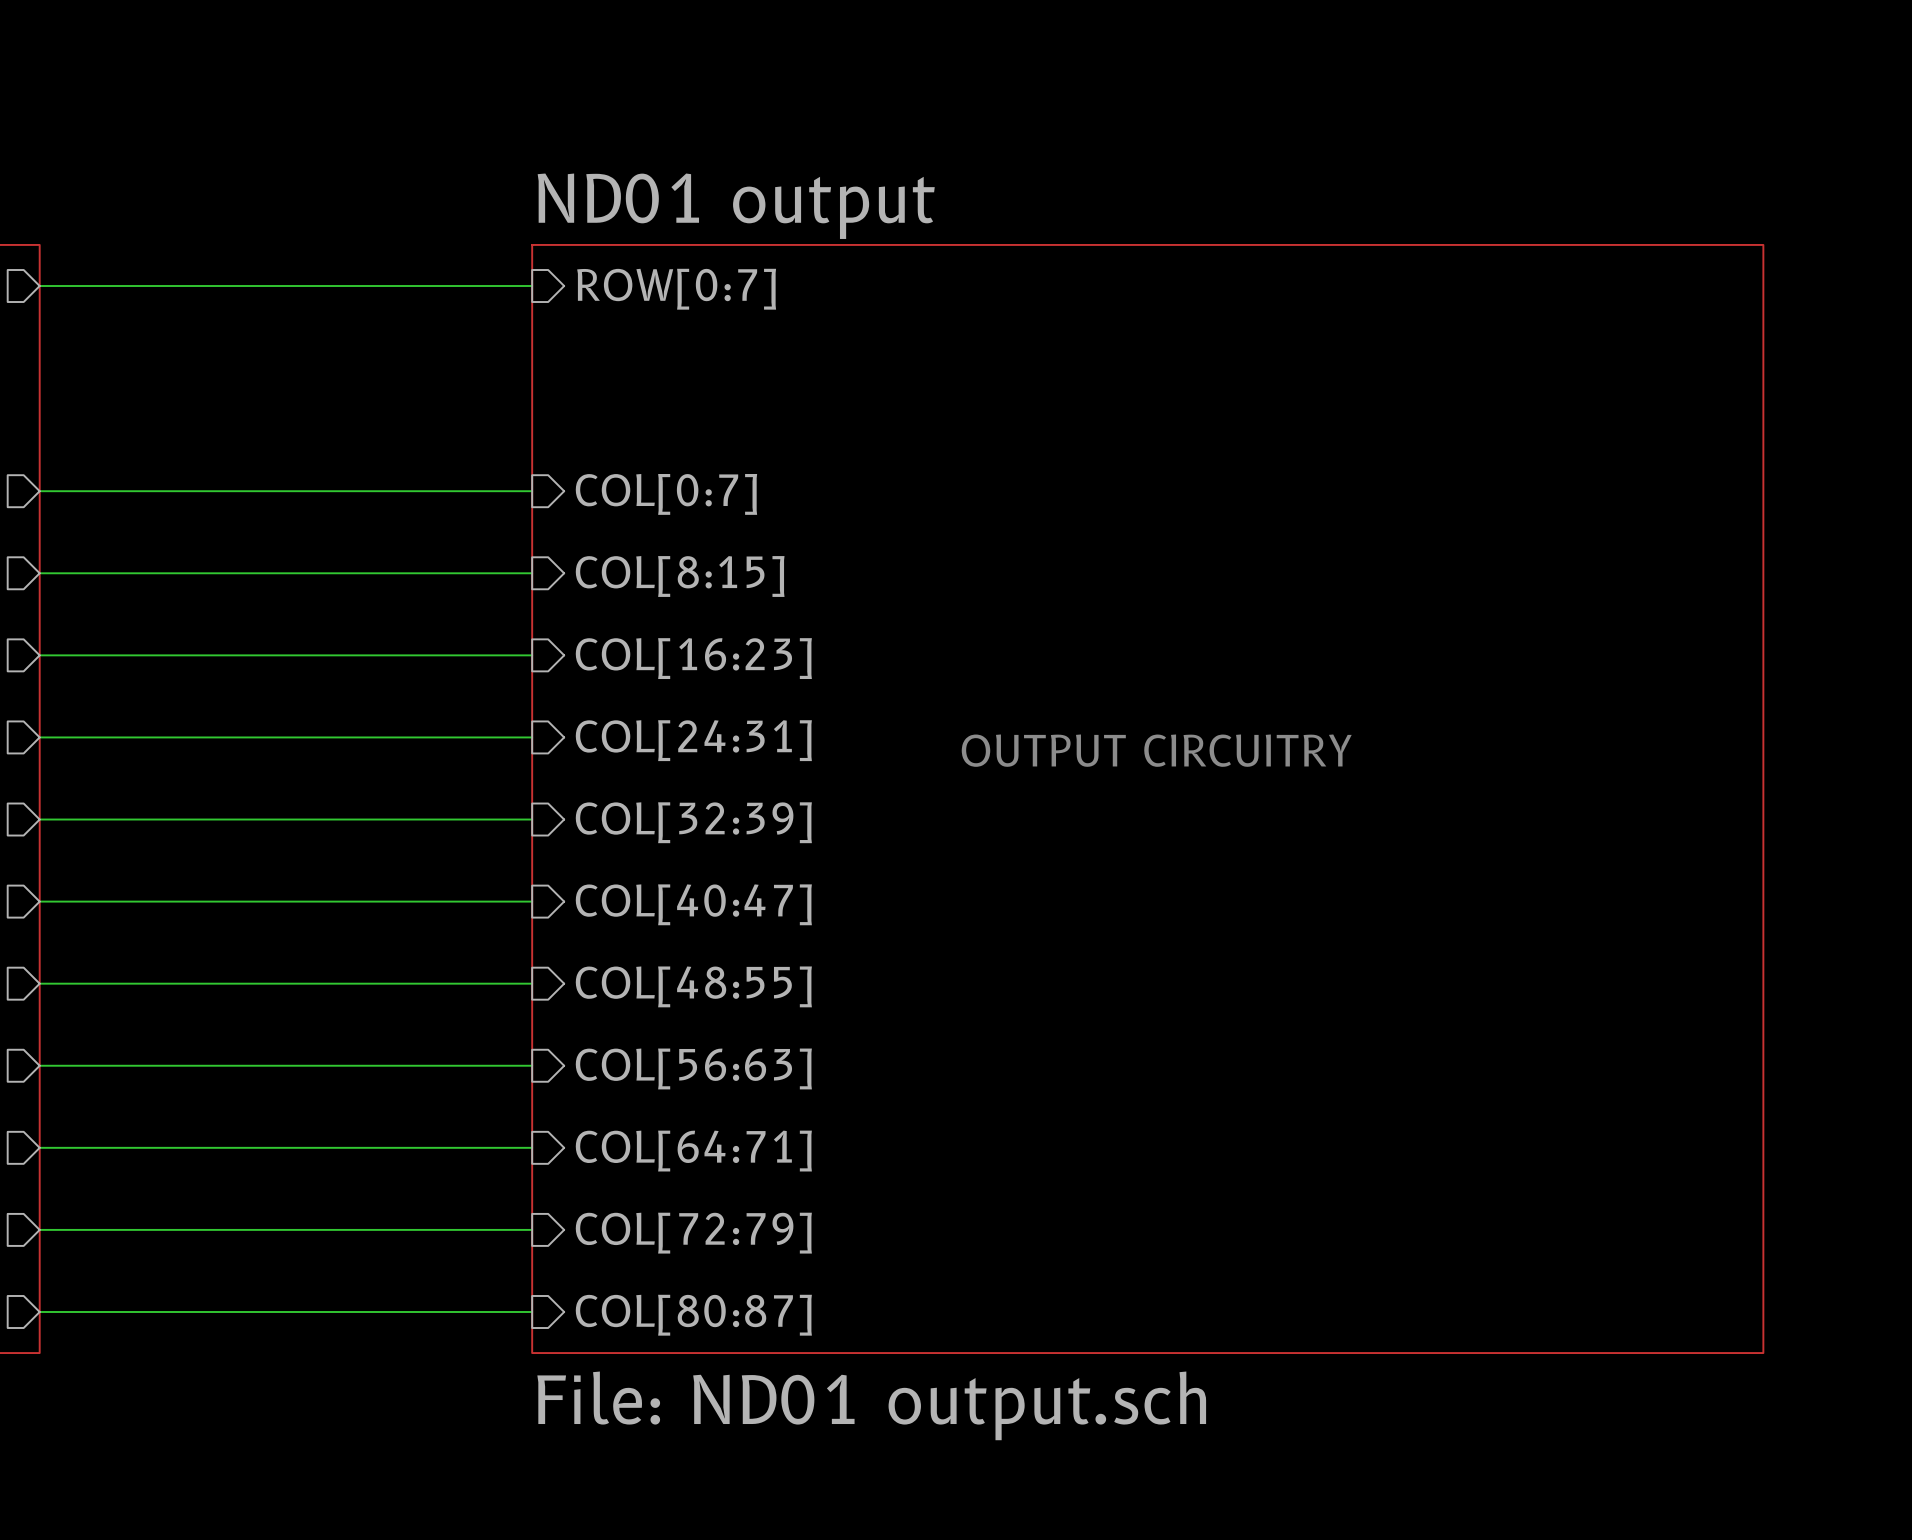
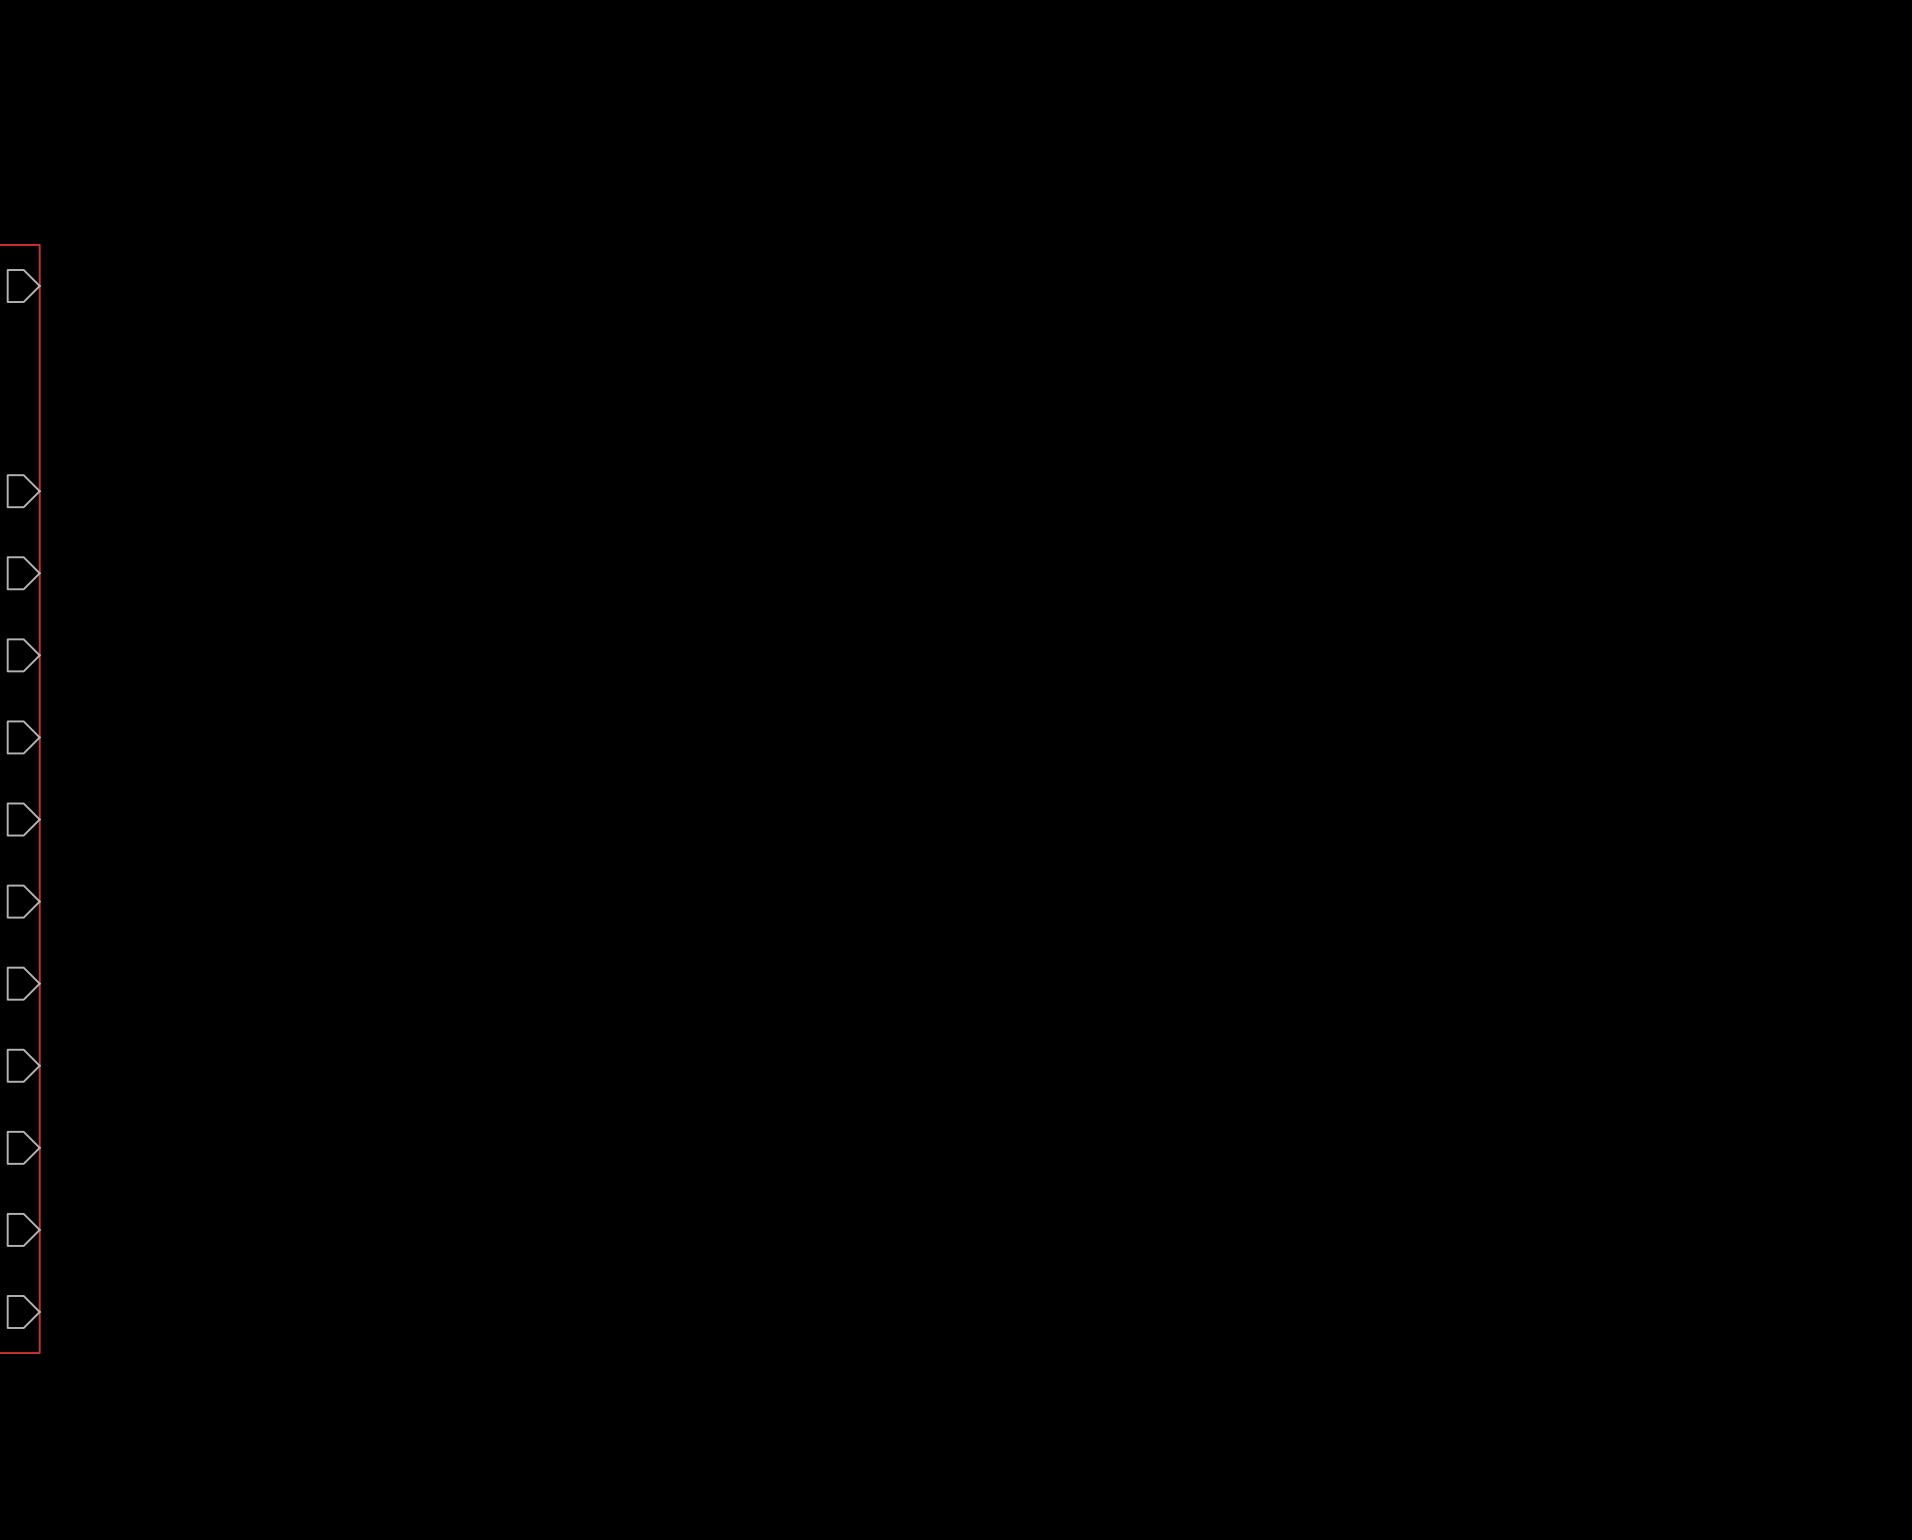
wire: (39, 286) (532, 286) -> none
sheet pin: ROW[0:7] (676, 289) -> none
wire: (39, 491) (532, 491) -> none
sheet pin: COL[0:7] (666, 494) -> none
wire: (39, 573) (532, 573) -> none
sheet pin: COL[8:15] (680, 576) -> none
wire: (39, 655) (532, 655) -> none
sheet pin: COL[16:23] (693, 658) -> none
wire: (39, 737) (532, 737) -> none
sheet pin: COL[24:31] (693, 740) -> none
text: OUTPUT CIRCUITRY (1156, 750) -> none
sheet ND01 output: File: ND01 output.sch (1147, 798) -> none
wire: (39, 819) (532, 819) -> none
sheet pin: COL[32:39] (693, 822) -> none
wire: (39, 901) (532, 901) -> none
sheet pin: COL[40:47] (693, 904) -> none
wire: (39, 983) (532, 983) -> none
sheet pin: COL[48:55] (693, 986) -> none
wire: (39, 1065) (532, 1065) -> none
sheet pin: COL[56:63] (693, 1068) -> none
wire: (39, 1147) (532, 1147) -> none
sheet pin: COL[64:71] (693, 1151) -> none
wire: (39, 1229) (532, 1229) -> none
sheet pin: COL[72:79] (693, 1233) -> none
wire: (39, 1311) (532, 1311) -> none
sheet pin: COL[80:87] (693, 1315) -> none

